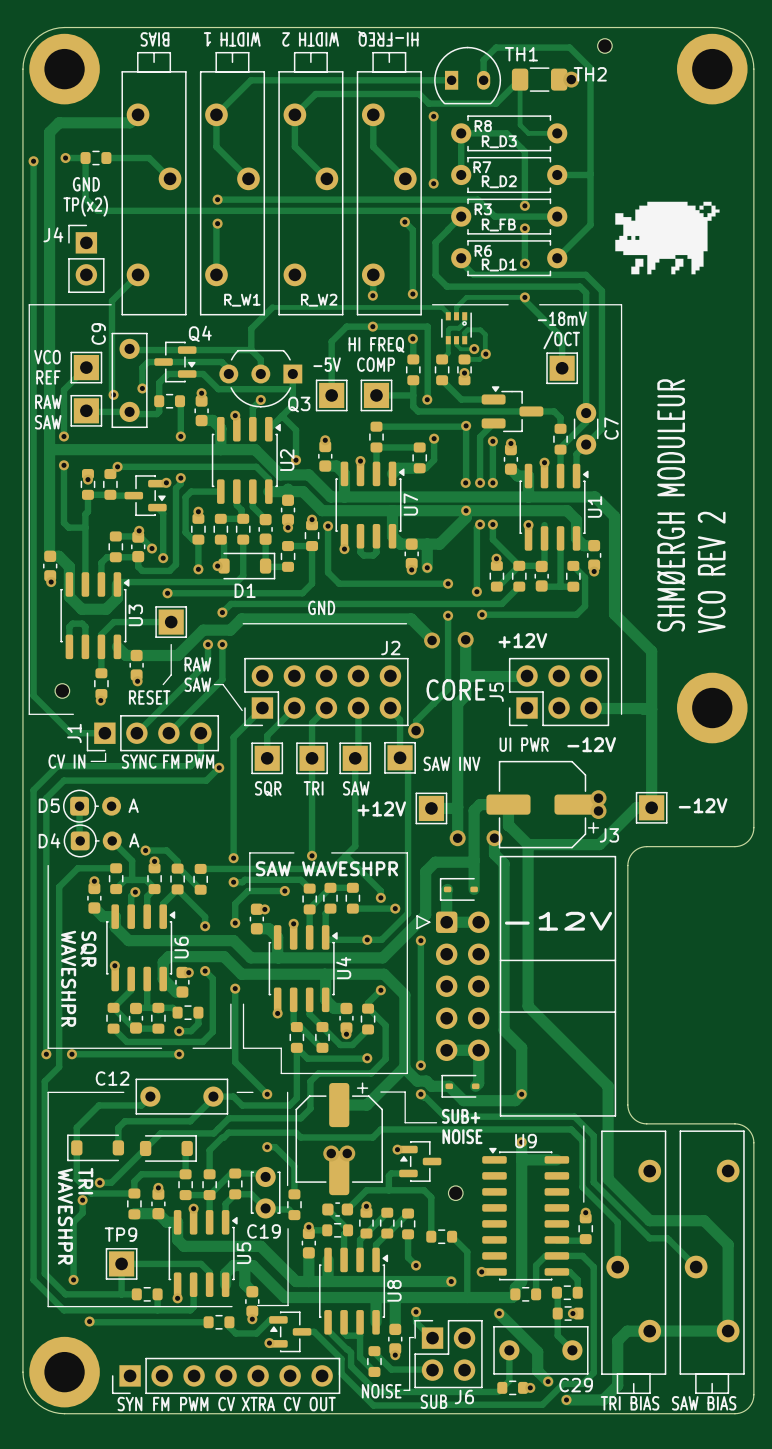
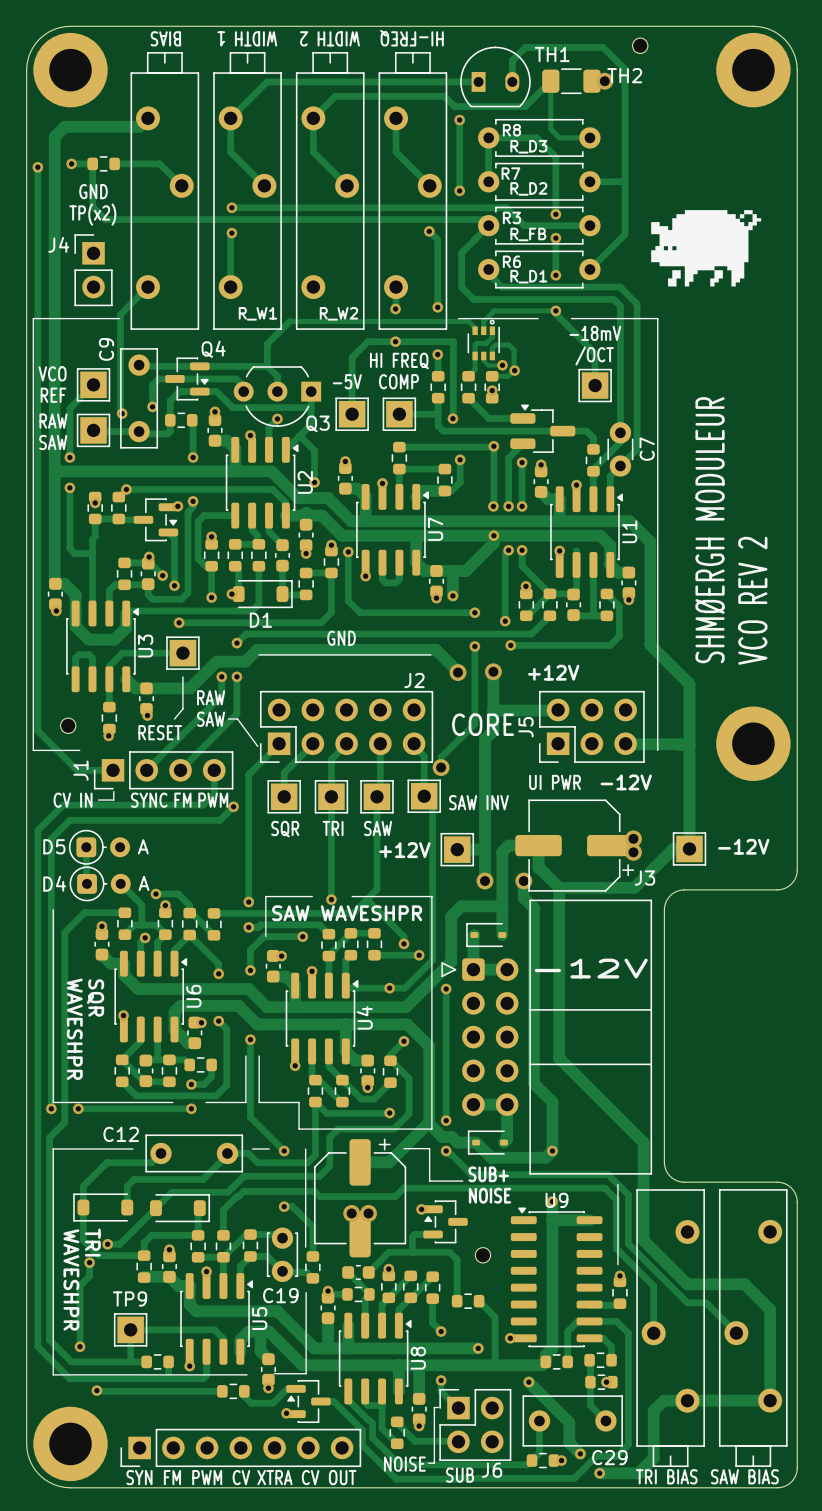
part footprint: [441, 312, 472, 345] -> [467, 319, 500, 361]

